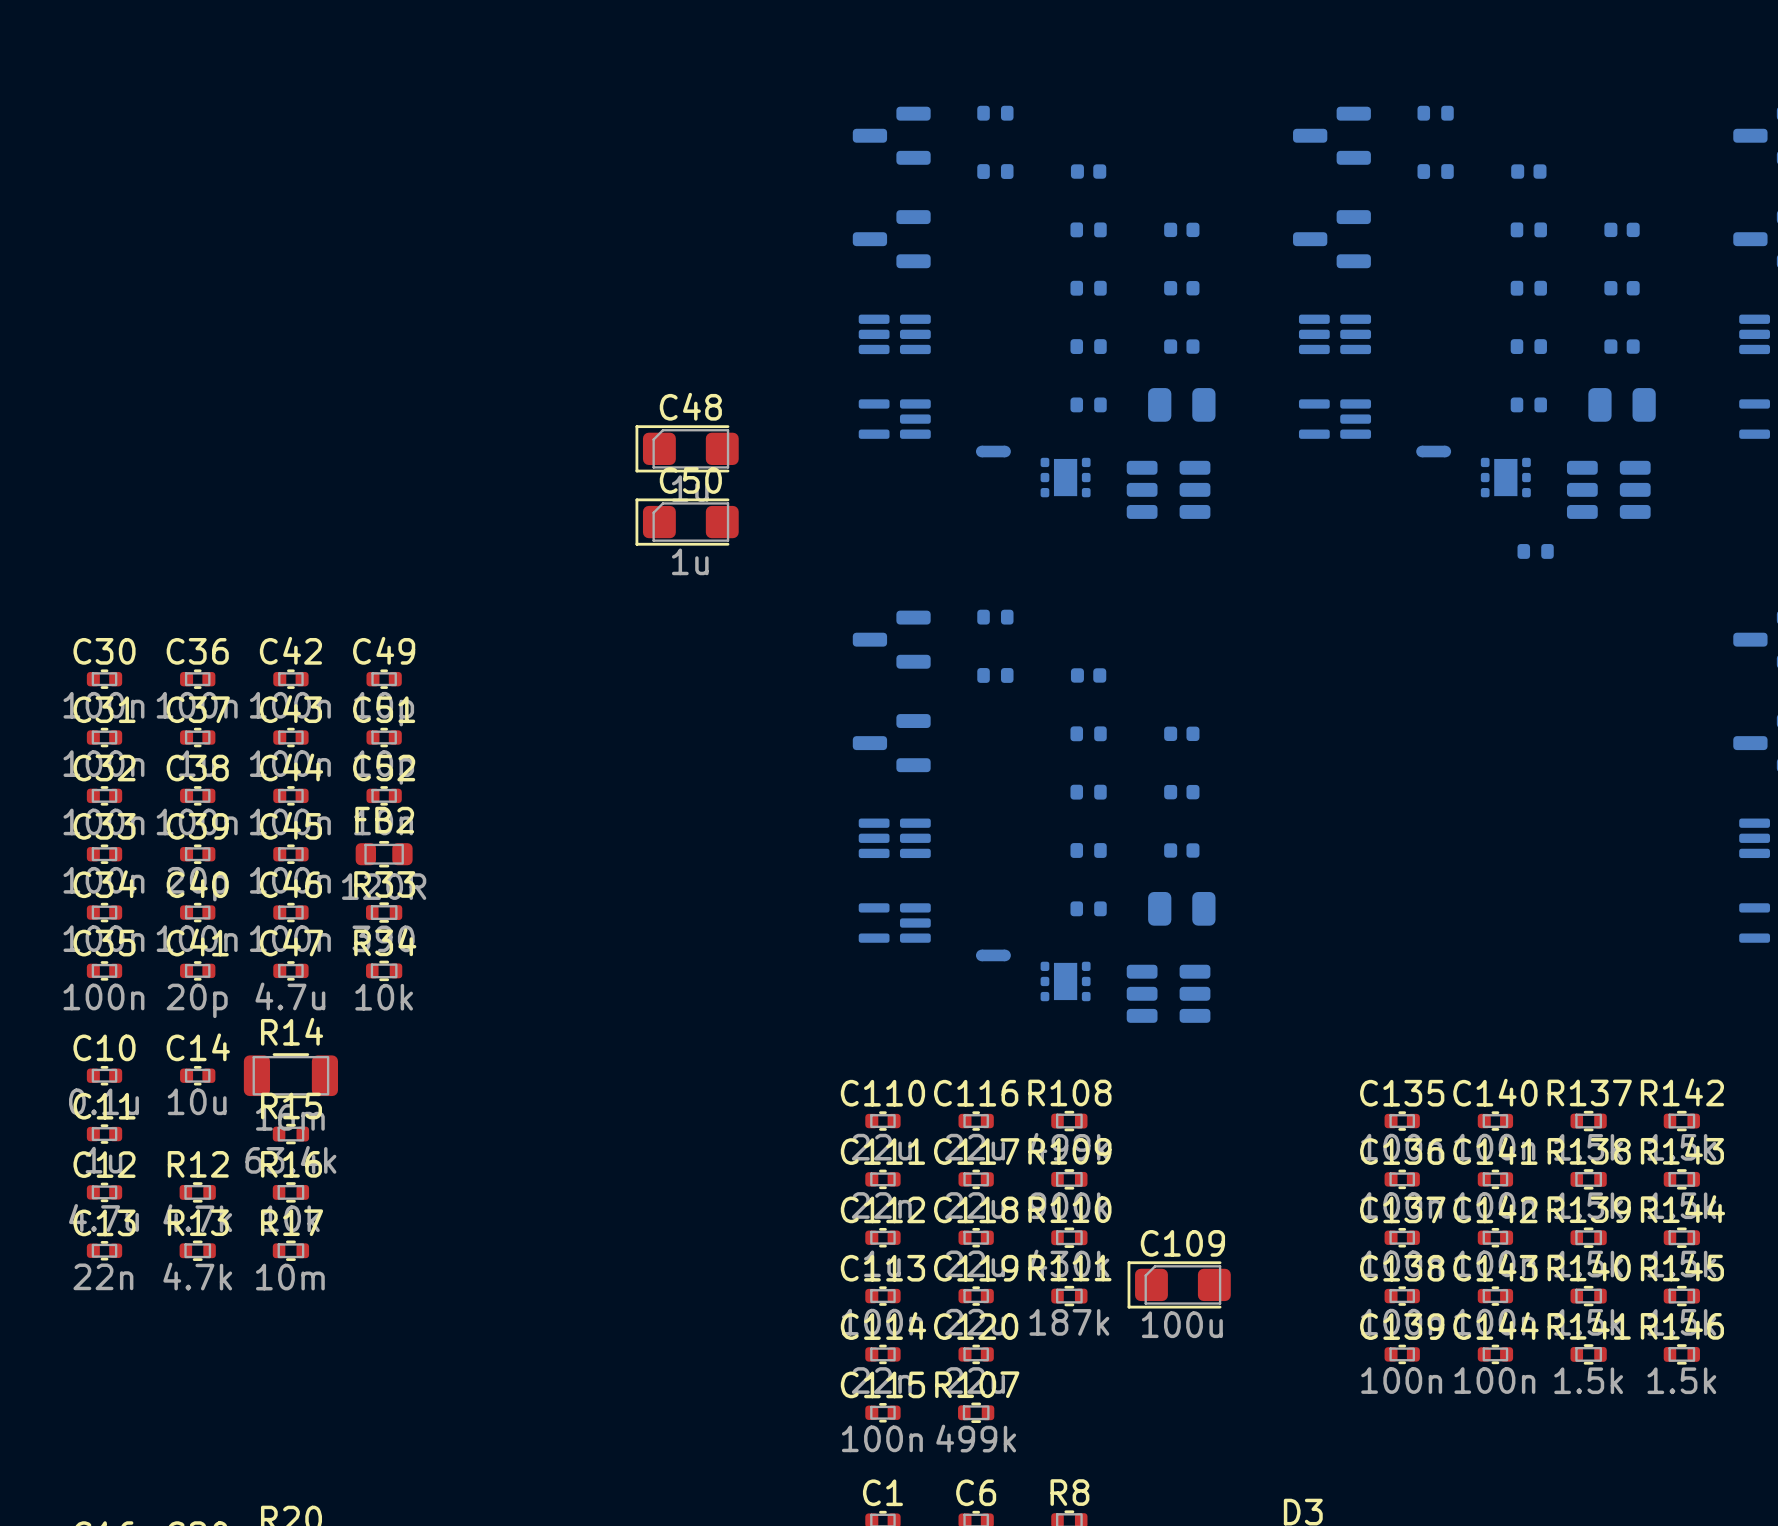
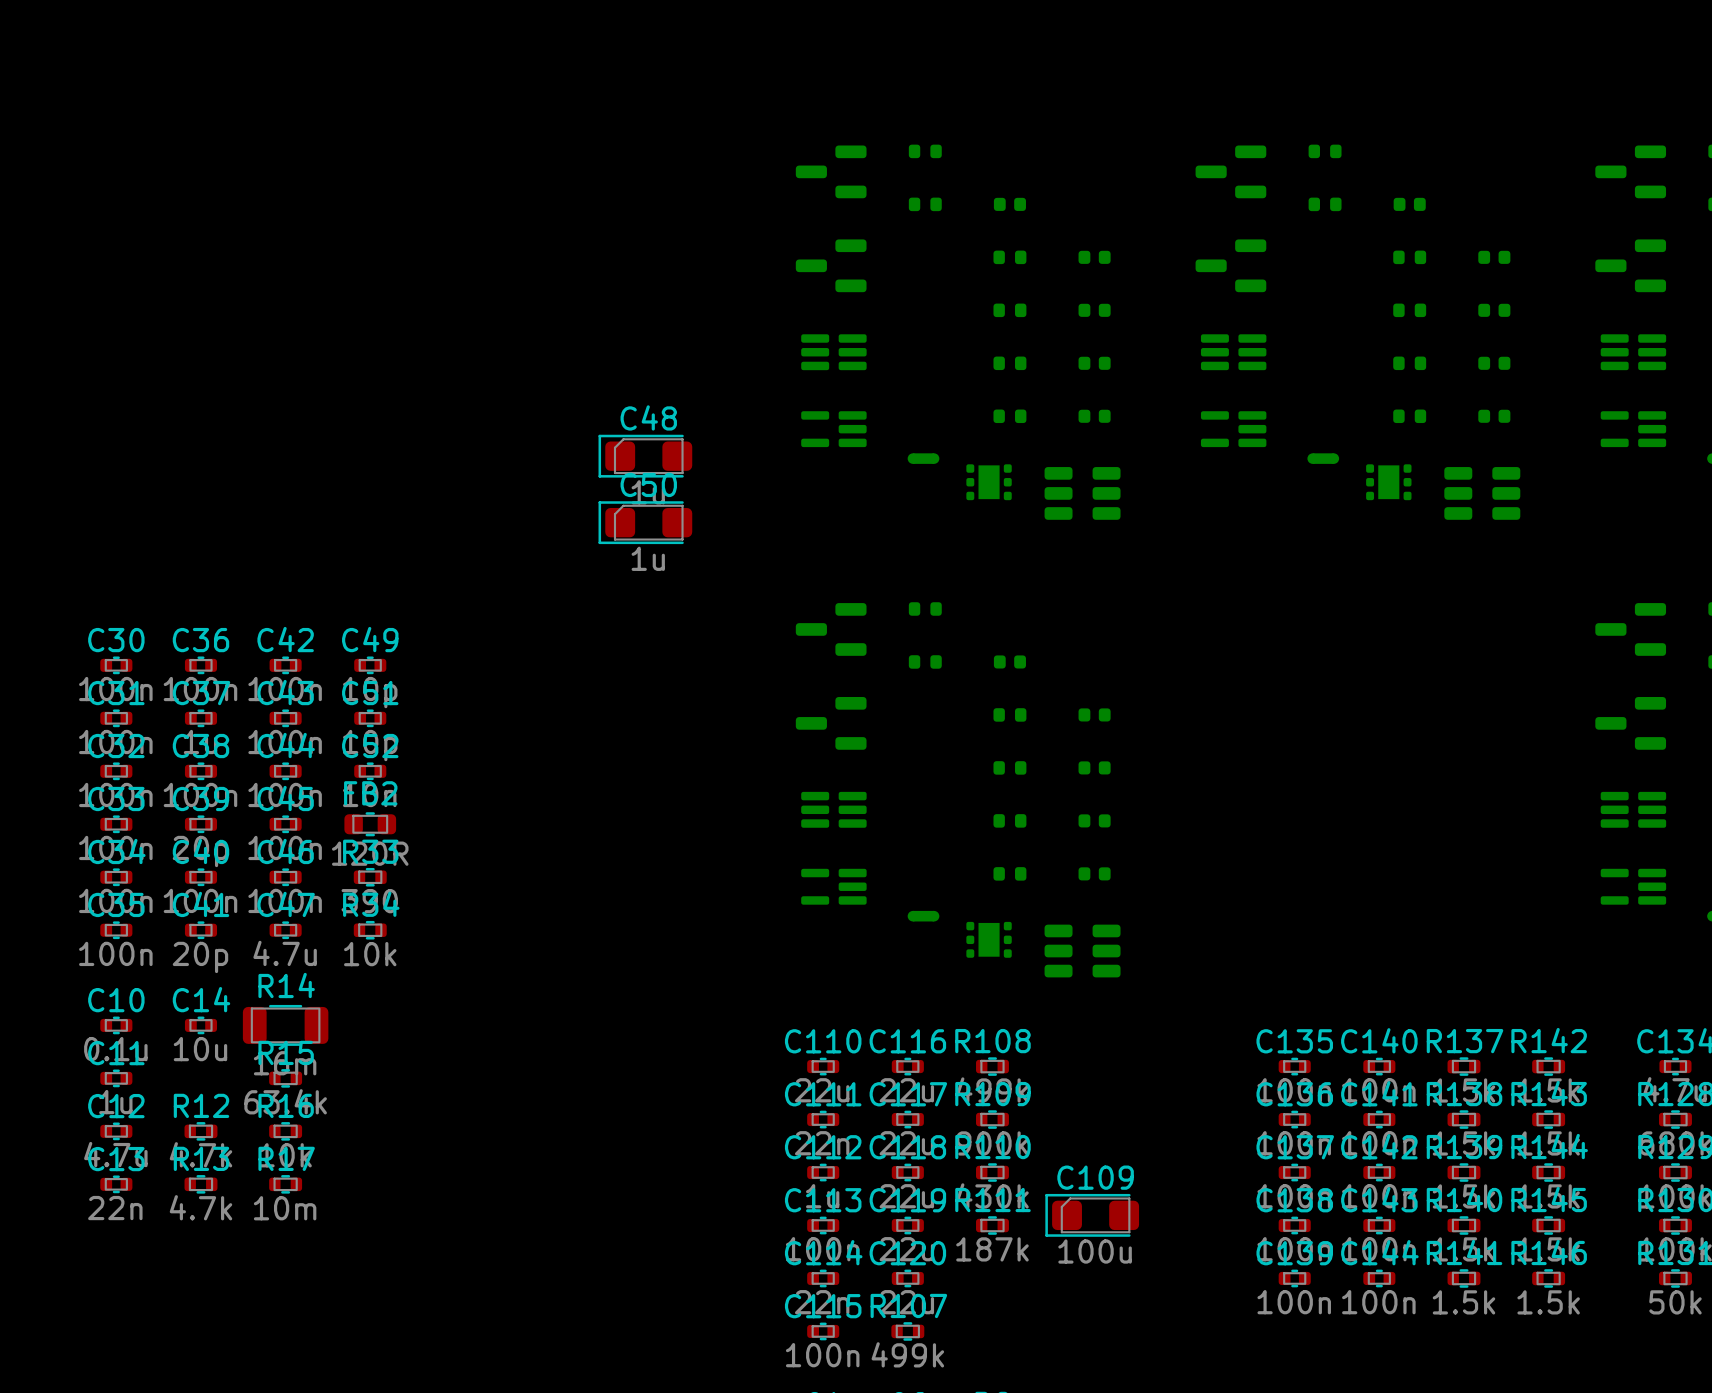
part footprint: [1148, 388, 1216, 422] -> [1078, 409, 1111, 423]
part footprint: [1588, 388, 1656, 422] -> [1478, 409, 1511, 423]
part: (1535, 551) -> none
part footprint: [1148, 891, 1216, 926] -> [1078, 867, 1111, 881]

